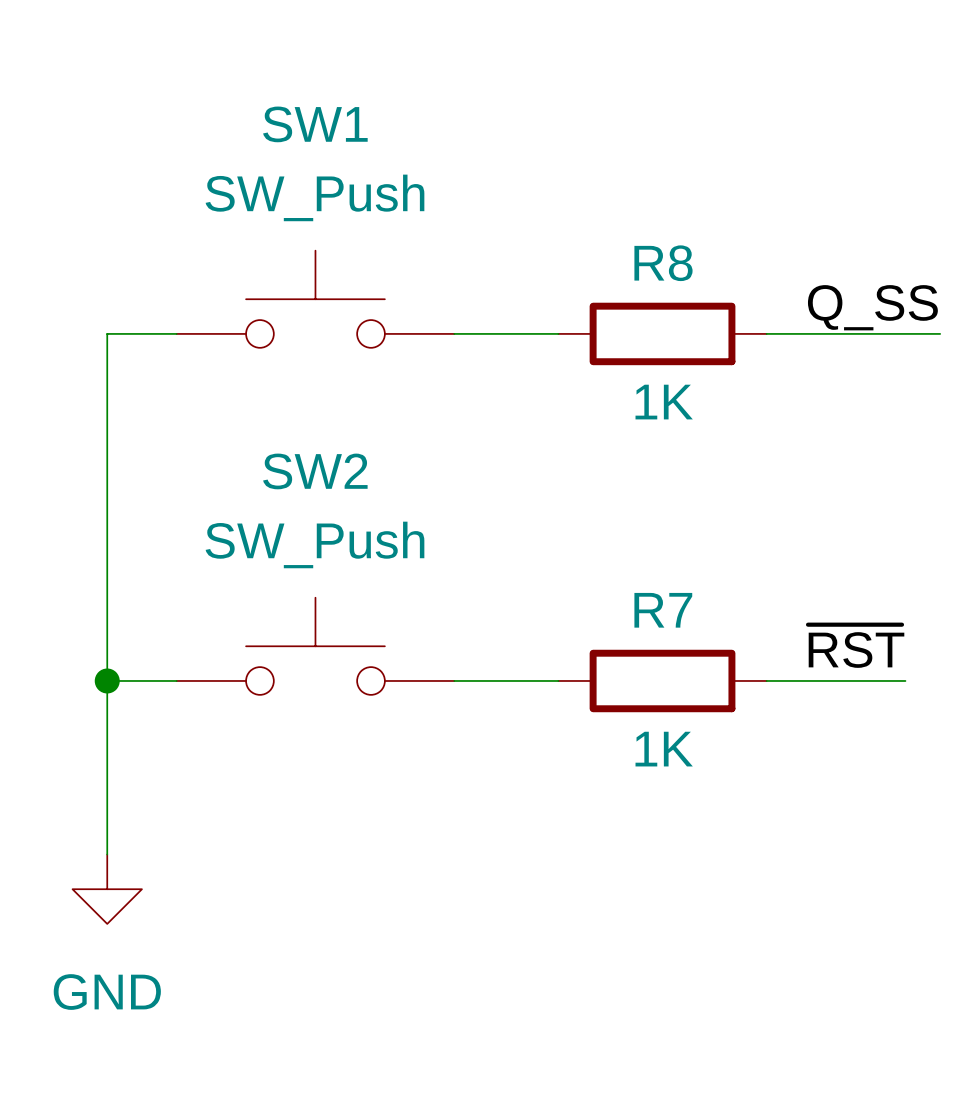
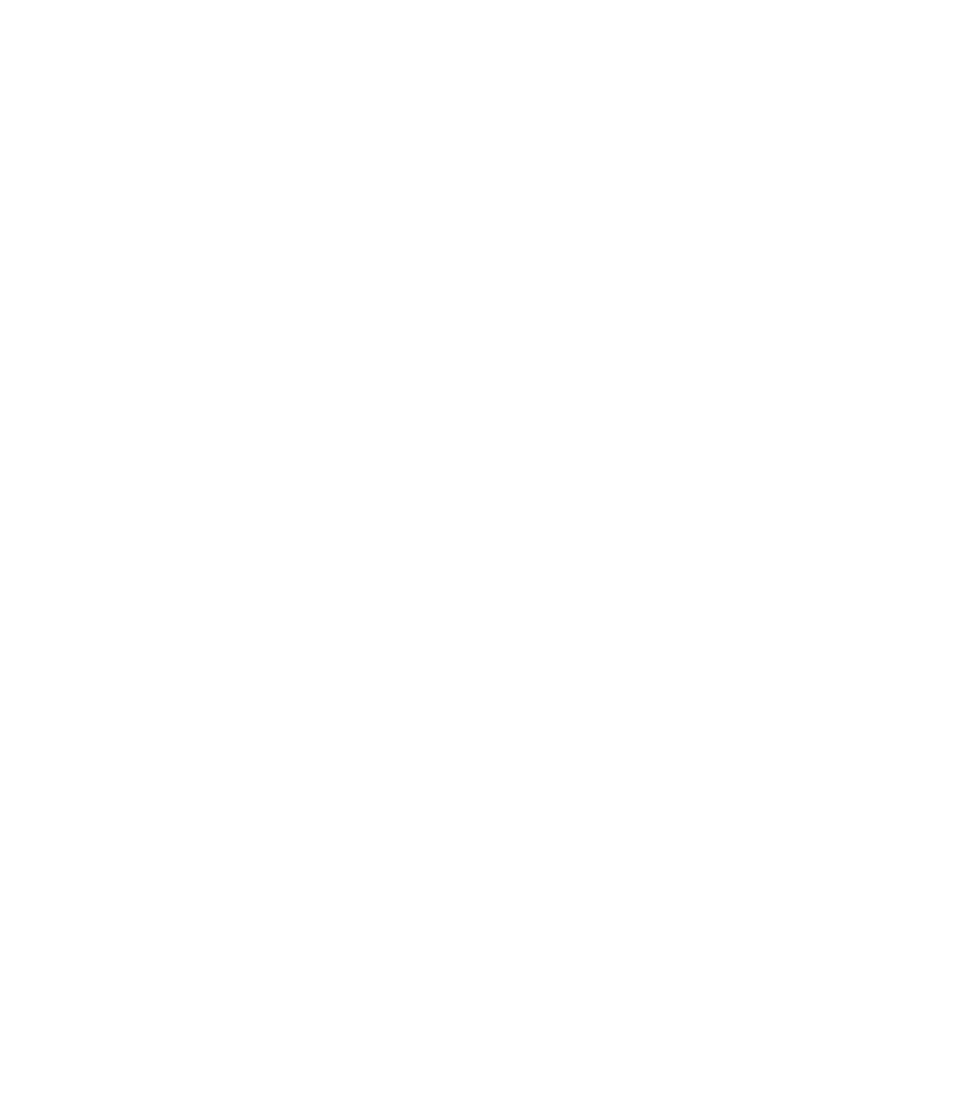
SW1: SW_Push (315, 299) -> none
label: Q_SS (872, 307) -> none
wire: (176, 333) (107, 333) (107, 854) -> none
wire: (454, 333) (558, 333) -> none
R8: 1K (662, 333) -> none
wire: (766, 333) (940, 333) -> none
SW2: SW_Push (315, 646) -> none
label: ~{RST} (856, 646) -> none
wire: (107, 680) (176, 680) -> none
junction: (107, 680) -> none
wire: (454, 680) (558, 680) -> none
R7: 1K (662, 680) -> none
wire: (766, 680) (905, 680) -> none
power symbol: GND (107, 889) -> none

